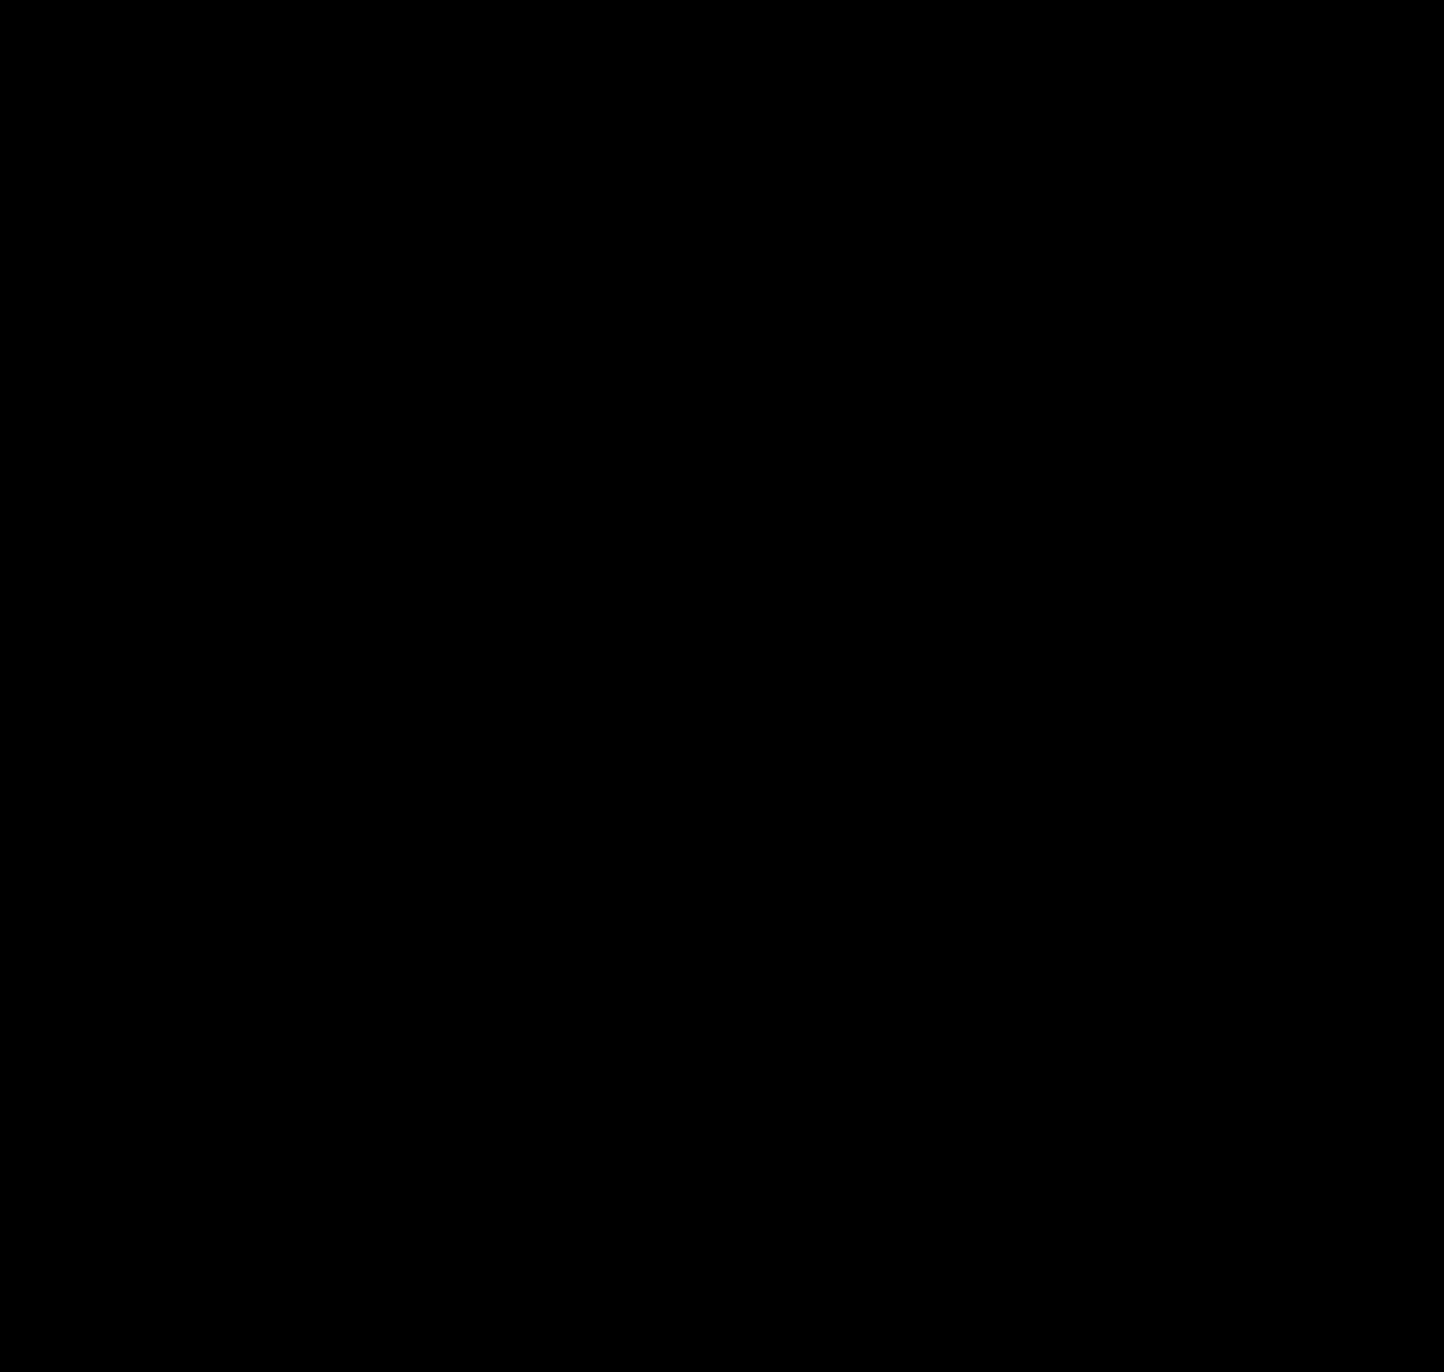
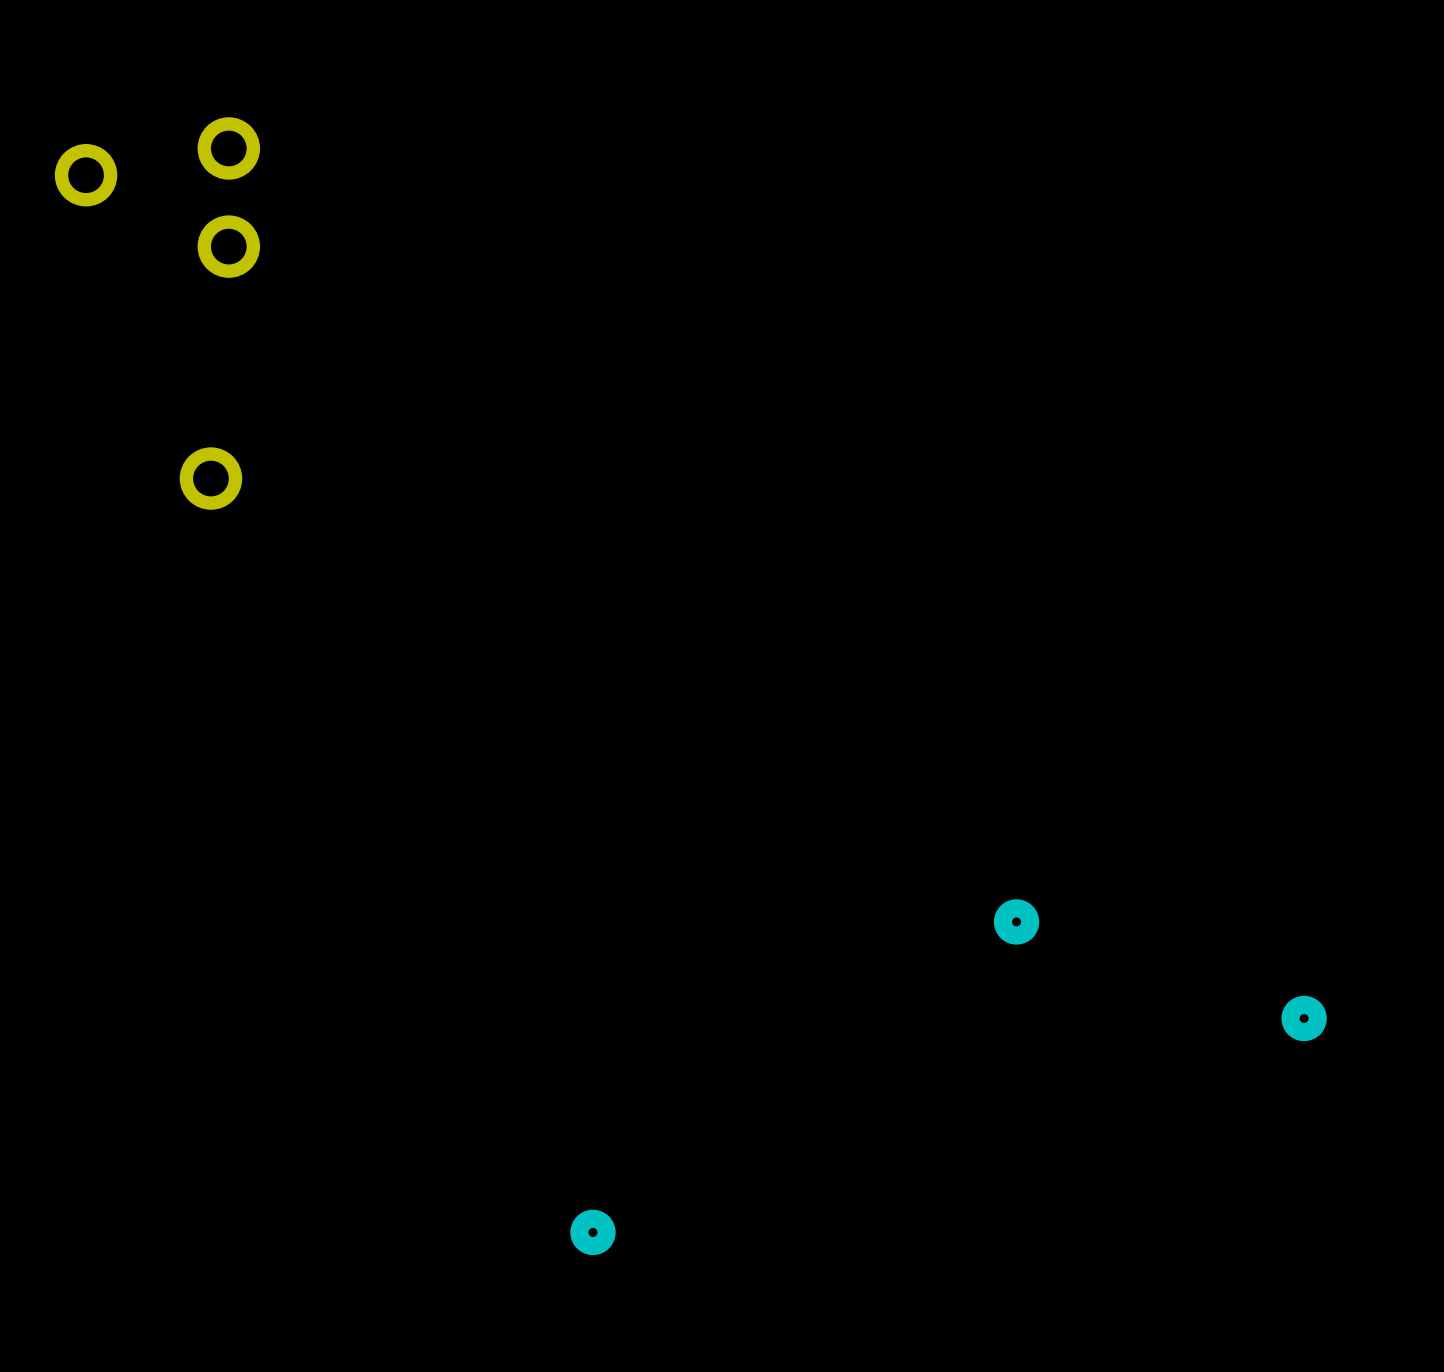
part: none -> (228, 148)
part: none -> (86, 175)
part: none -> (228, 246)
part: none -> (210, 478)
part: none -> (1016, 921)
part: none -> (1304, 1018)
part: none -> (592, 1232)

